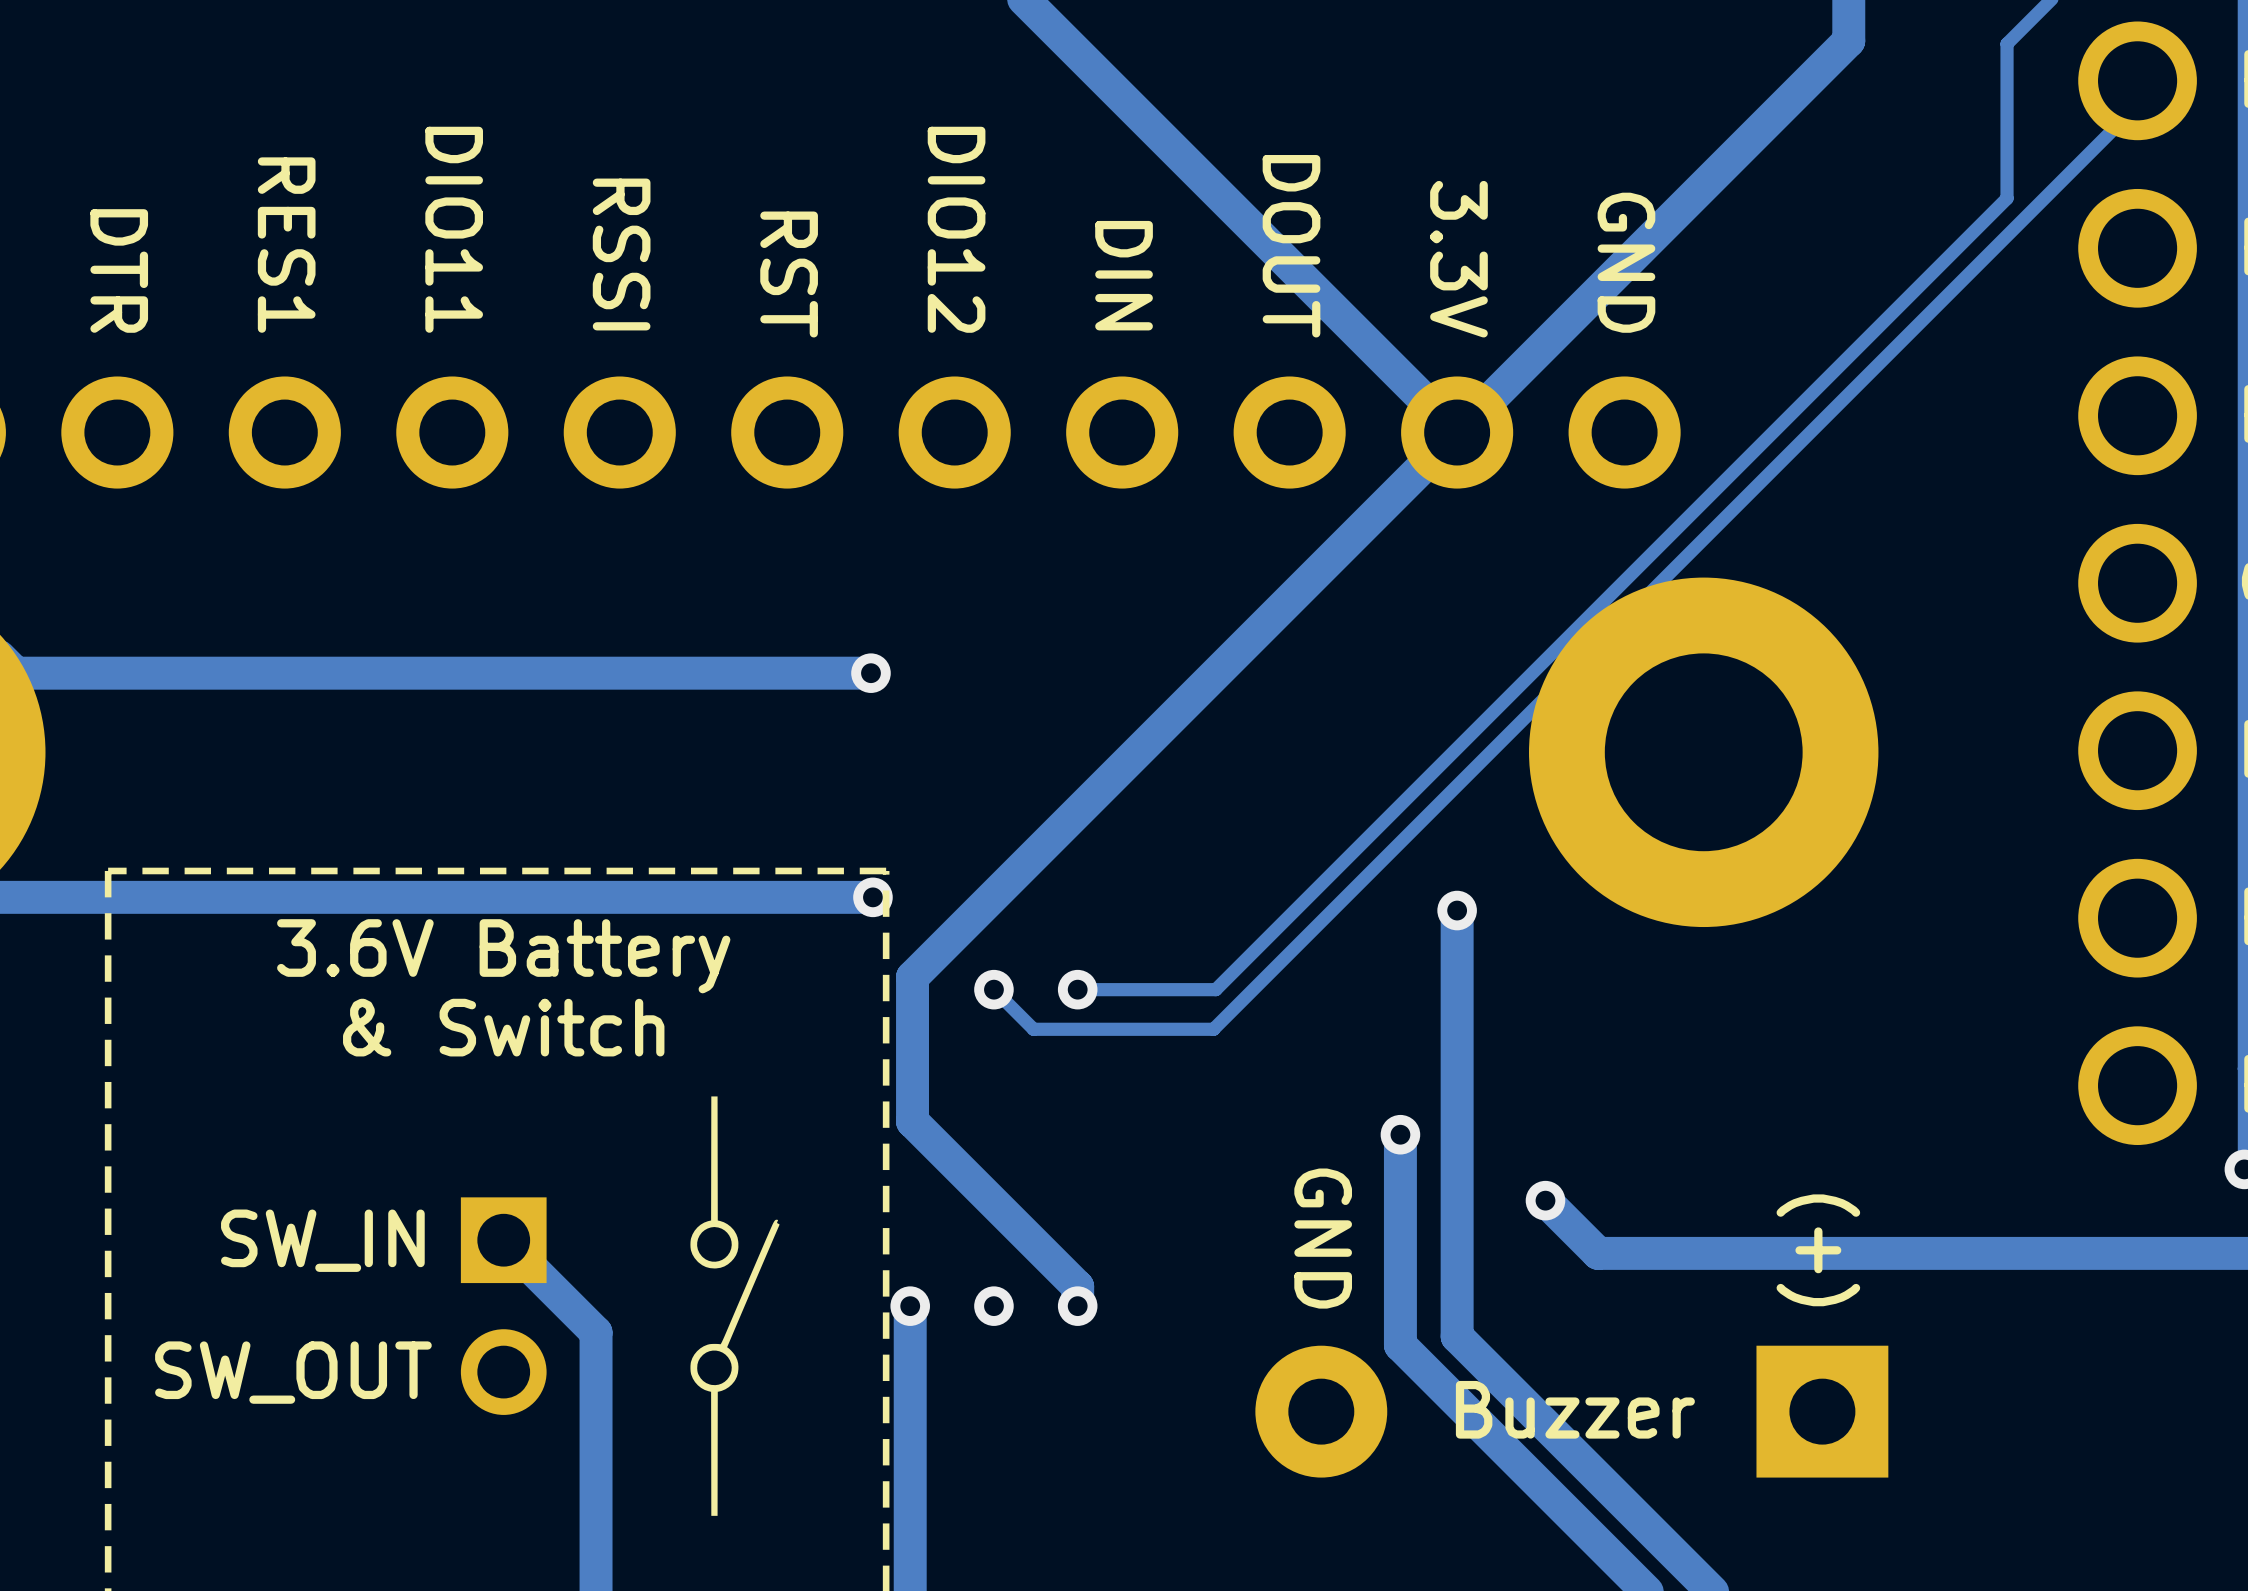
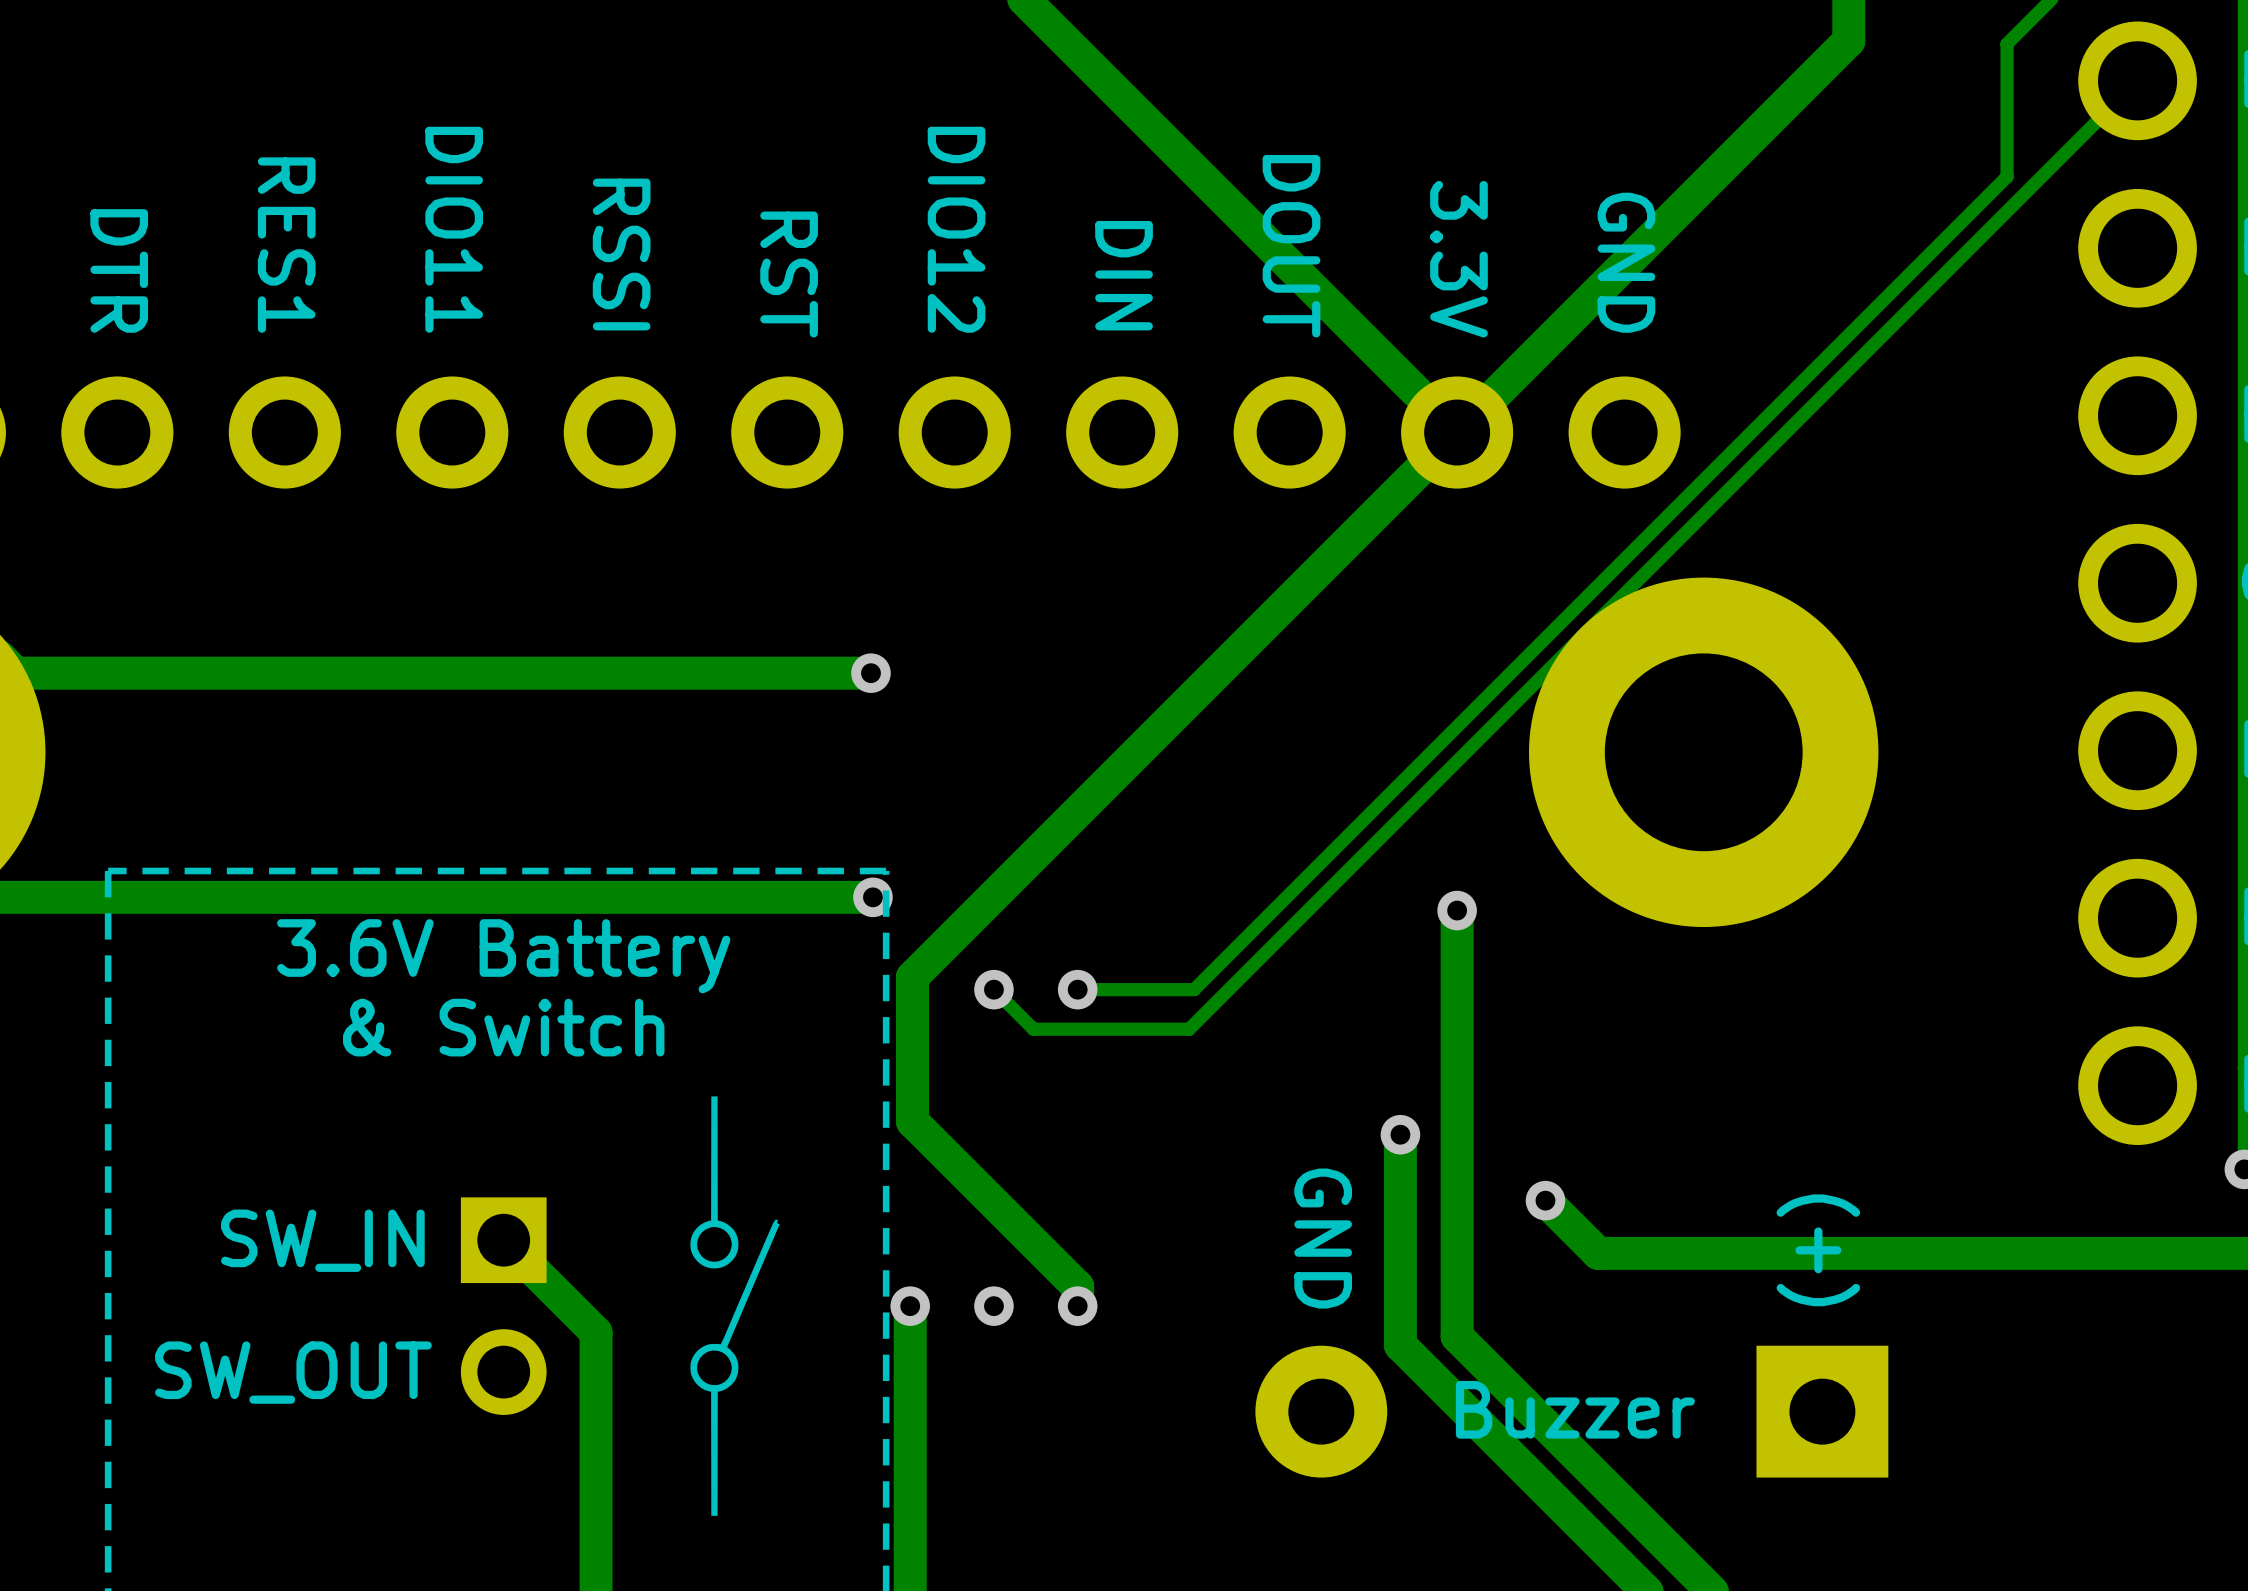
track: (2137, 80) (2137, 105) (1213, 1029) (1189, 1029) -> (2137, 80) (1189, 1029)
track: (2007, 176) (2007, 198) (1215, 989) (1194, 989) -> (2007, 176) (1194, 989)

